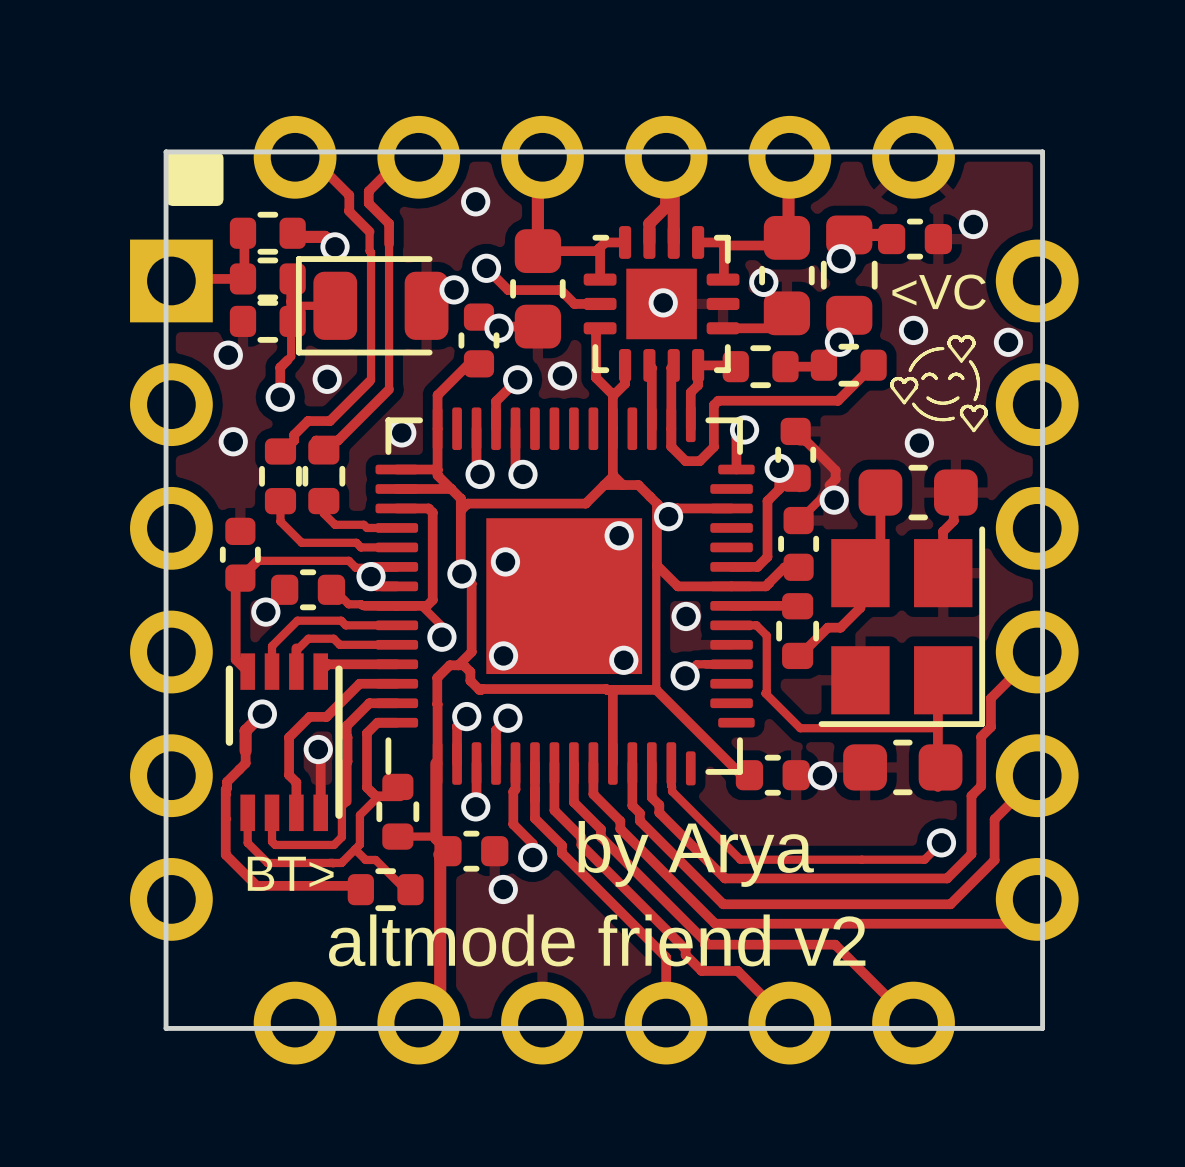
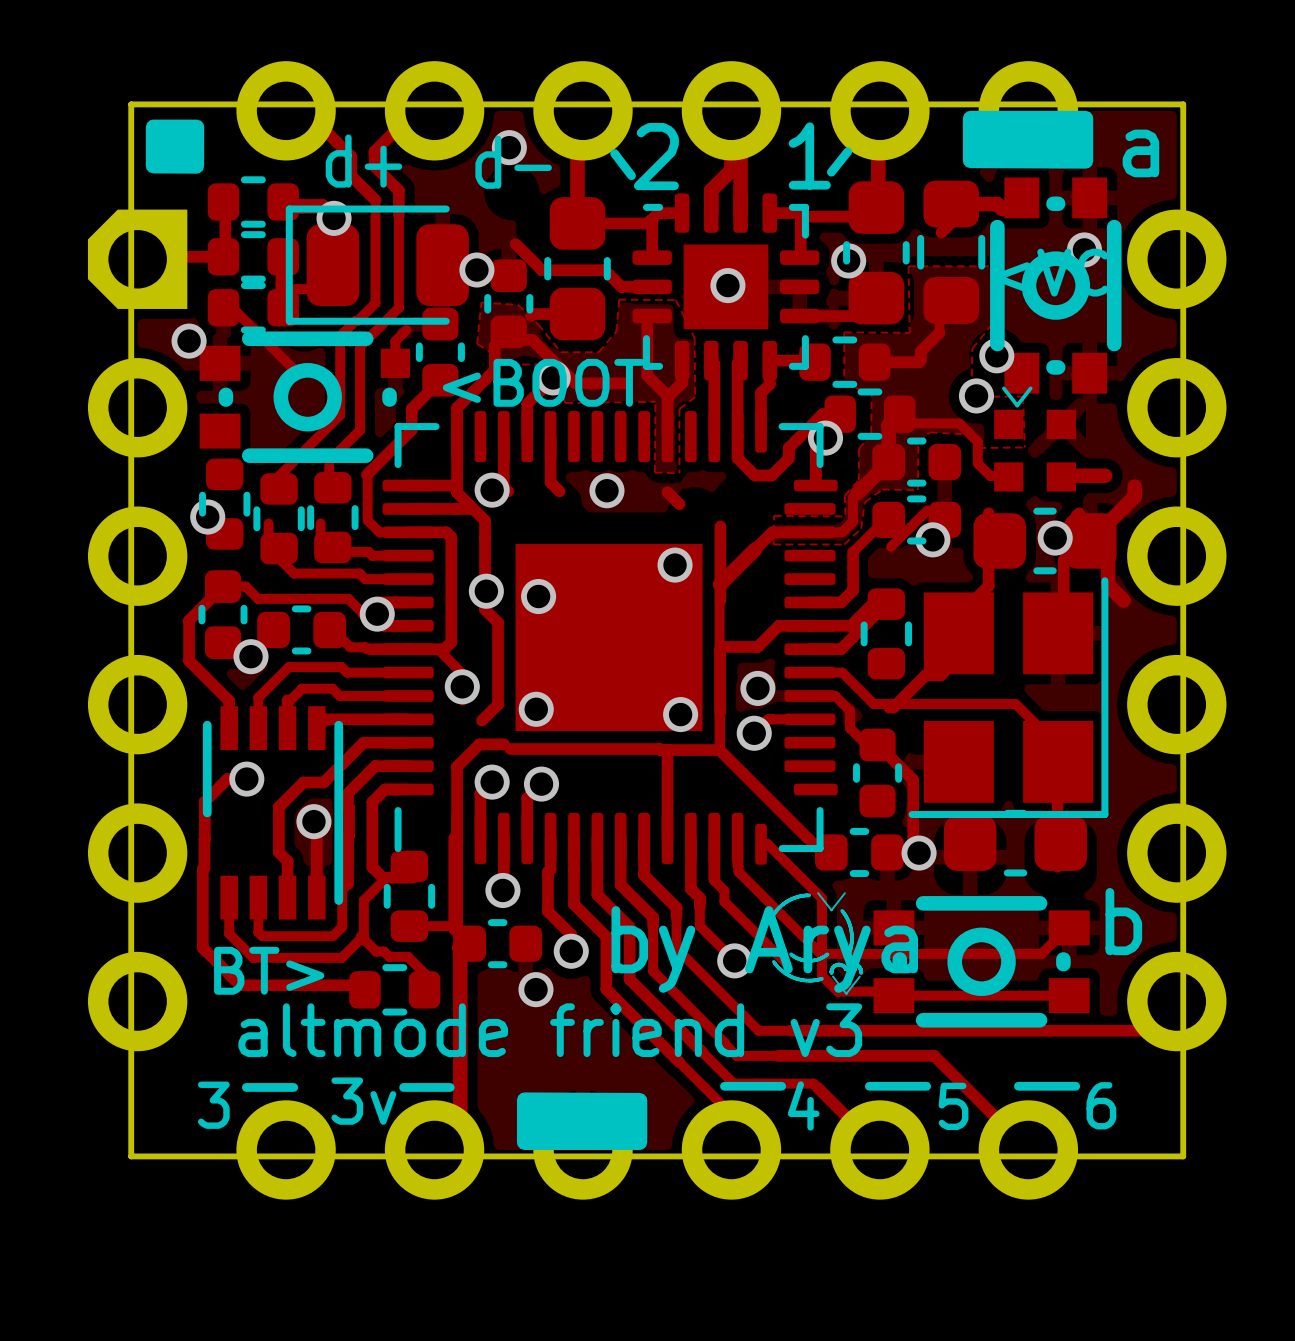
drawing shape: [166, 151, 224, 206] -> [145, 119, 205, 174]
drawing: none -> [962, 110, 1094, 169]
text: none -> a (1140, 153)
line: none -> (847, 151) (831, 172)
line: none -> (614, 153) (631, 175)
text: none -> 1 (809, 155)
text: none -> 2 (656, 156)
text: none -> d+ (364, 161)
text: none -> d- (513, 162)
via position: (475, 201) -> (509, 147)
via: (973, 224) -> none
part footprint: [130, 239, 213, 941] -> [87, 209, 188, 1052]
part: (914, 239) -> none
track: (369, 250) (371, 379) (329, 421) (308, 421) (294, 434) (294, 440) (283, 451) -> (375, 223) (375, 303) (340, 336) (340, 415) (277, 477) (277, 488)
via: (841, 258) -> none
via: (486, 268) -> none
via: none -> (1084, 249)
zone outline: none -> (908, 266) (909, 332) (844, 332) (844, 384) (871, 393) (871, 433) (858, 449) (858, 480) (844, 495) (845, 516) (774, 515) (773, 544) (844, 544) (861, 528) (864, 502) (882, 489) (917, 490) (918, 442) (930, 432) (969, 434) (978, 448) (1024, 447) (1023, 396) (980, 396) (971, 388) (972, 348) (993, 322) (991, 266) (908, 266)
part: none -> (1055, 285)
part position: (372, 305) -> (377, 265)
zone outline: none -> (618, 299) (675, 300) (694, 338) (695, 397) (679, 408) (679, 473) (654, 472) (655, 401) (565, 403) (546, 364) (509, 364) (477, 344) (481, 302) (518, 304) (538, 324) (560, 352) (598, 352) (616, 331) (619, 299)
track: (291, 318) (291, 356) (280, 367) (280, 397) -> none
track: none -> (232, 307) (293, 369)
track: (389, 321) (389, 389) (338, 440) (316, 440) (327, 451) -> (398, 307) (360, 346) (360, 430) (329, 461) (329, 483)
via: (499, 328) -> none
via: (913, 330) -> none
track: none -> (406, 330) (395, 341) (395, 363)
part position: (478, 340) -> (508, 303)
via: (839, 342) -> none
via: (1008, 342) -> none
line: (942, 348) (932, 350) (922, 354) (910, 370) -> (809, 895) (796, 897) (785, 902) (776, 911) (769, 921)
via position: (228, 355) -> (189, 341)
part: none -> (440, 352)
via: none -> (996, 355)
line: (961, 361) (950, 346) (961, 361) -> none
line: (961, 361) (972, 346) (961, 361) -> none
line: (970, 361) (978, 379) (977, 390) (974, 399) -> (842, 910) (848, 921) (851, 932) (851, 945) (847, 956)
track: (478, 363) (468, 363) (437, 395) (437, 404) -> (627, 383) (575, 383) (532, 339) (516, 339) (508, 331) (494, 345) (494, 370) (457, 407)
part position: (848, 365) -> (869, 414)
track: (873, 365) (838, 400) (718, 400) (713, 405) (713, 438) -> (840, 414) (822, 414) (788, 448)
via: (562, 375) -> none
via: (327, 379) -> none
track: none -> (440, 380) (411, 408) (411, 429) (366, 474)
text: none -> <BOOT (543, 382)
via: none -> (976, 395)
part: none -> (304, 397)
via: (280, 397) -> none
line: (927, 397) (942, 403) (958, 397) -> (791, 954) (799, 959) (809, 960) (818, 959) (827, 954)
line: (913, 404) (922, 413) (931, 417) (942, 419) (953, 418) -> (773, 961) (784, 972) (796, 978) (809, 980) (821, 978)
track: (612, 428) (612, 476) (585, 503) (467, 503) (460, 510) -> none
line: (973, 430) (985, 416) (973, 430) -> none
line: (973, 430) (962, 416) (973, 430) -> none
via: (401, 432) -> none
track: (799, 440) (805, 440) (835, 470) (835, 479) (829, 485) -> none
part: none -> (1035, 450)
via: (233, 441) -> none
via: (919, 443) -> none
part: none -> (916, 462)
part: (795, 454) -> none
track: none -> (367, 475) (367, 520) (379, 532) (408, 532)
track: none -> (1004, 475) (990, 475) (977, 463) (977, 441) (959, 423) (909, 423) (899, 414) (888, 425) (888, 462) (852, 497) (852, 521) (842, 532) (809, 532)
track: none -> (1056, 475) (1105, 475)
via: (779, 468) -> none
track: none -> (1134, 486) (1134, 496) (1090, 540) (1108, 558) (1108, 585) (1123, 600)
via: none -> (606, 490)
via position: (480, 474) -> (492, 490)
via: (522, 474) -> none
part: (280, 476) -> none
part: (323, 476) -> none
part: none -> (224, 504)
track: (604, 485) (638, 485) (661, 508) (700, 508) -> (720, 584) (772, 532)
track: (799, 487) (779, 468) (779, 489) (767, 501) (767, 524) -> (885, 519) (853, 552)
part position: (918, 492) -> (1045, 540)
via: none -> (207, 517)
part: none -> (332, 517)
part: none -> (279, 518)
part: none -> (916, 519)
via position: (834, 500) -> (932, 539)
via: none -> (1055, 538)
via: (668, 516) -> none
part: (798, 543) -> none
part position: (240, 554) -> (222, 614)
track: (656, 565) (677, 586) (705, 586) -> (720, 749) (720, 649) (722, 646) (757, 646) (778, 625)
via position: (461, 573) -> (486, 591)
track: (378, 576) (369, 567) (355, 567) (348, 560) (258, 560) (240, 578) -> none
track: (234, 585) (235, 587) (235, 659) (247, 671) -> (377, 614) (363, 614) (348, 598) (258, 598) (245, 586) (222, 586) (189, 620) (189, 660) (229, 700) (229, 728)
track: (757, 605) (795, 605) (797, 607) -> (841, 649) (879, 610) (882, 610)
via position: (686, 616) -> (757, 688)
track: (756, 625) (766, 635) (765, 693) (800, 728) (935, 728) (937, 725) -> (839, 672) (842, 672) (873, 704) (1015, 704) (1063, 751) (1063, 761)
part position: (901, 626) -> (1008, 697)
part position: (797, 631) -> (886, 633)
track: none -> (809, 695) (835, 695) (850, 710) (850, 728) (866, 744) (878, 744) (913, 780) (913, 847) (919, 853)
track: (1037, 652) (990, 698) (990, 727) (981, 736) (981, 786) (971, 795) (971, 854) (947, 878) (725, 878) (659, 812) (659, 805) (651, 797) -> (784, 962) (724, 901) (724, 890) (714, 879)
track: (482, 689) (479, 689) (470, 680) (470, 671) (463, 665) (449, 665) (437, 677) (437, 704) -> (504, 744) (479, 744) (456, 767)
part: none -> (877, 773)
track: (262, 714) (245, 730) (245, 763) (227, 781) -> (246, 779) (227, 779) (204, 801) (204, 839)
track: none -> (204, 839) (204, 860)
track: none -> (761, 844) (767, 844) (822, 898) (822, 975) (837, 991) (889, 991) (893, 995) (1069, 995)
track: (1037, 776) (994, 819) (994, 860) (950, 904) (723, 904) (639, 820) -> (734, 960) (699, 926) (699, 907)
line: none -> (818, 893) (831, 910) (844, 893)
track: (620, 828) (715, 923) -> (676, 916) (676, 948) (758, 1030) (790, 1030)
text: none -> b (1123, 921)
track: (600, 836) (705, 941) (705, 944) -> (653, 926) (653, 971) (736, 1055) (778, 1055)
via: (941, 842) -> none
track: none -> (360, 936) (376, 951) (384, 951) (389, 956) (407, 956) (426, 975) (426, 984)
track: (581, 845) (685, 949) (685, 954) (701, 970) (737, 970) -> (629, 936) (629, 979) (733, 1083) (813, 1083) (817, 1087)
track: (355, 849) (365, 859) (375, 859) (405, 889) (410, 889) -> none
track: (561, 853) (666, 957) (666, 993) -> (606, 945) (606, 989) (731, 1114)
via: none -> (734, 960)
part: none -> (981, 961)
line: none -> (832, 976) (846, 993) (859, 976)
text: altmode friend v2 (597, 940) -> altmode friend v3 (550, 1030)
line: none -> (246, 1087) (293, 1087)
line: none -> (403, 1087) (450, 1087)
line: none -> (724, 1086) (781, 1086)
line: none -> (869, 1086) (926, 1086)
line: none -> (1018, 1086) (1075, 1086)
drawing: none -> [516, 1092, 648, 1150]
text: none -> 3v (363, 1101)
text: none -> 3 (213, 1105)
text: none -> 5 (953, 1106)
text: none -> 6 (1101, 1105)
text: none -> 4 (803, 1105)

